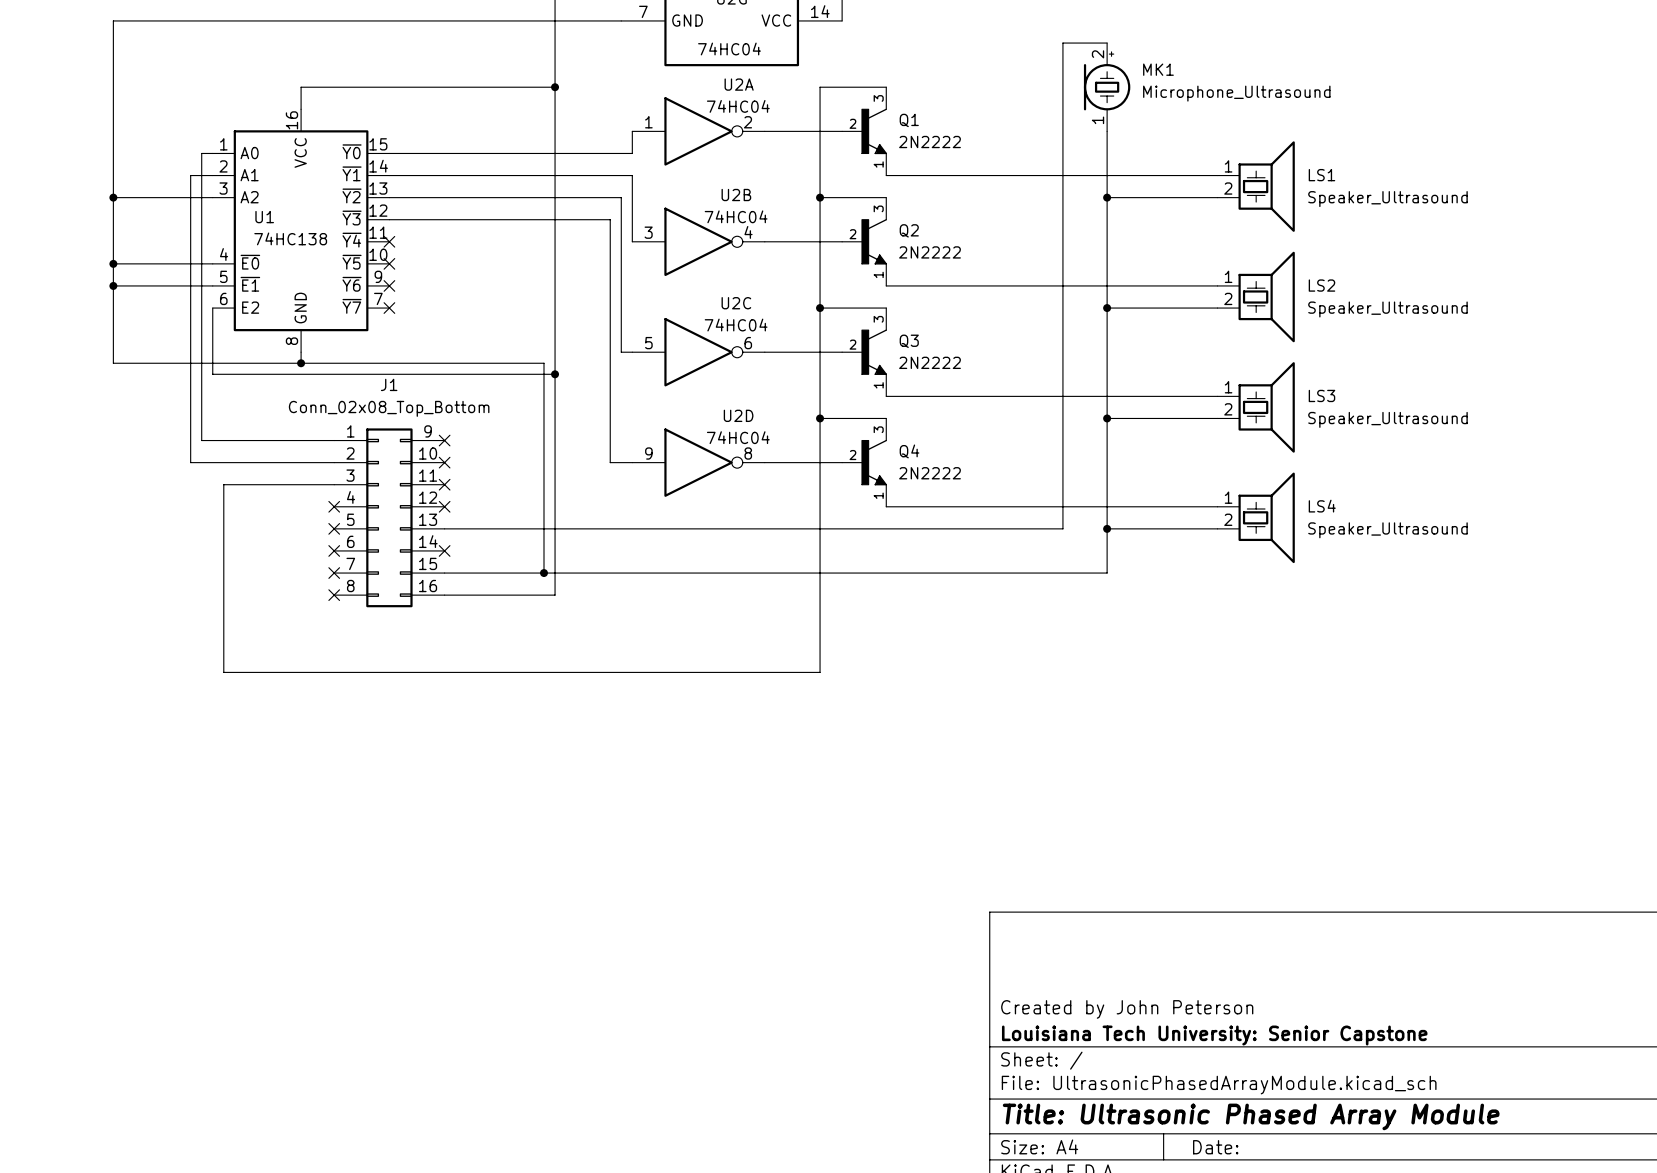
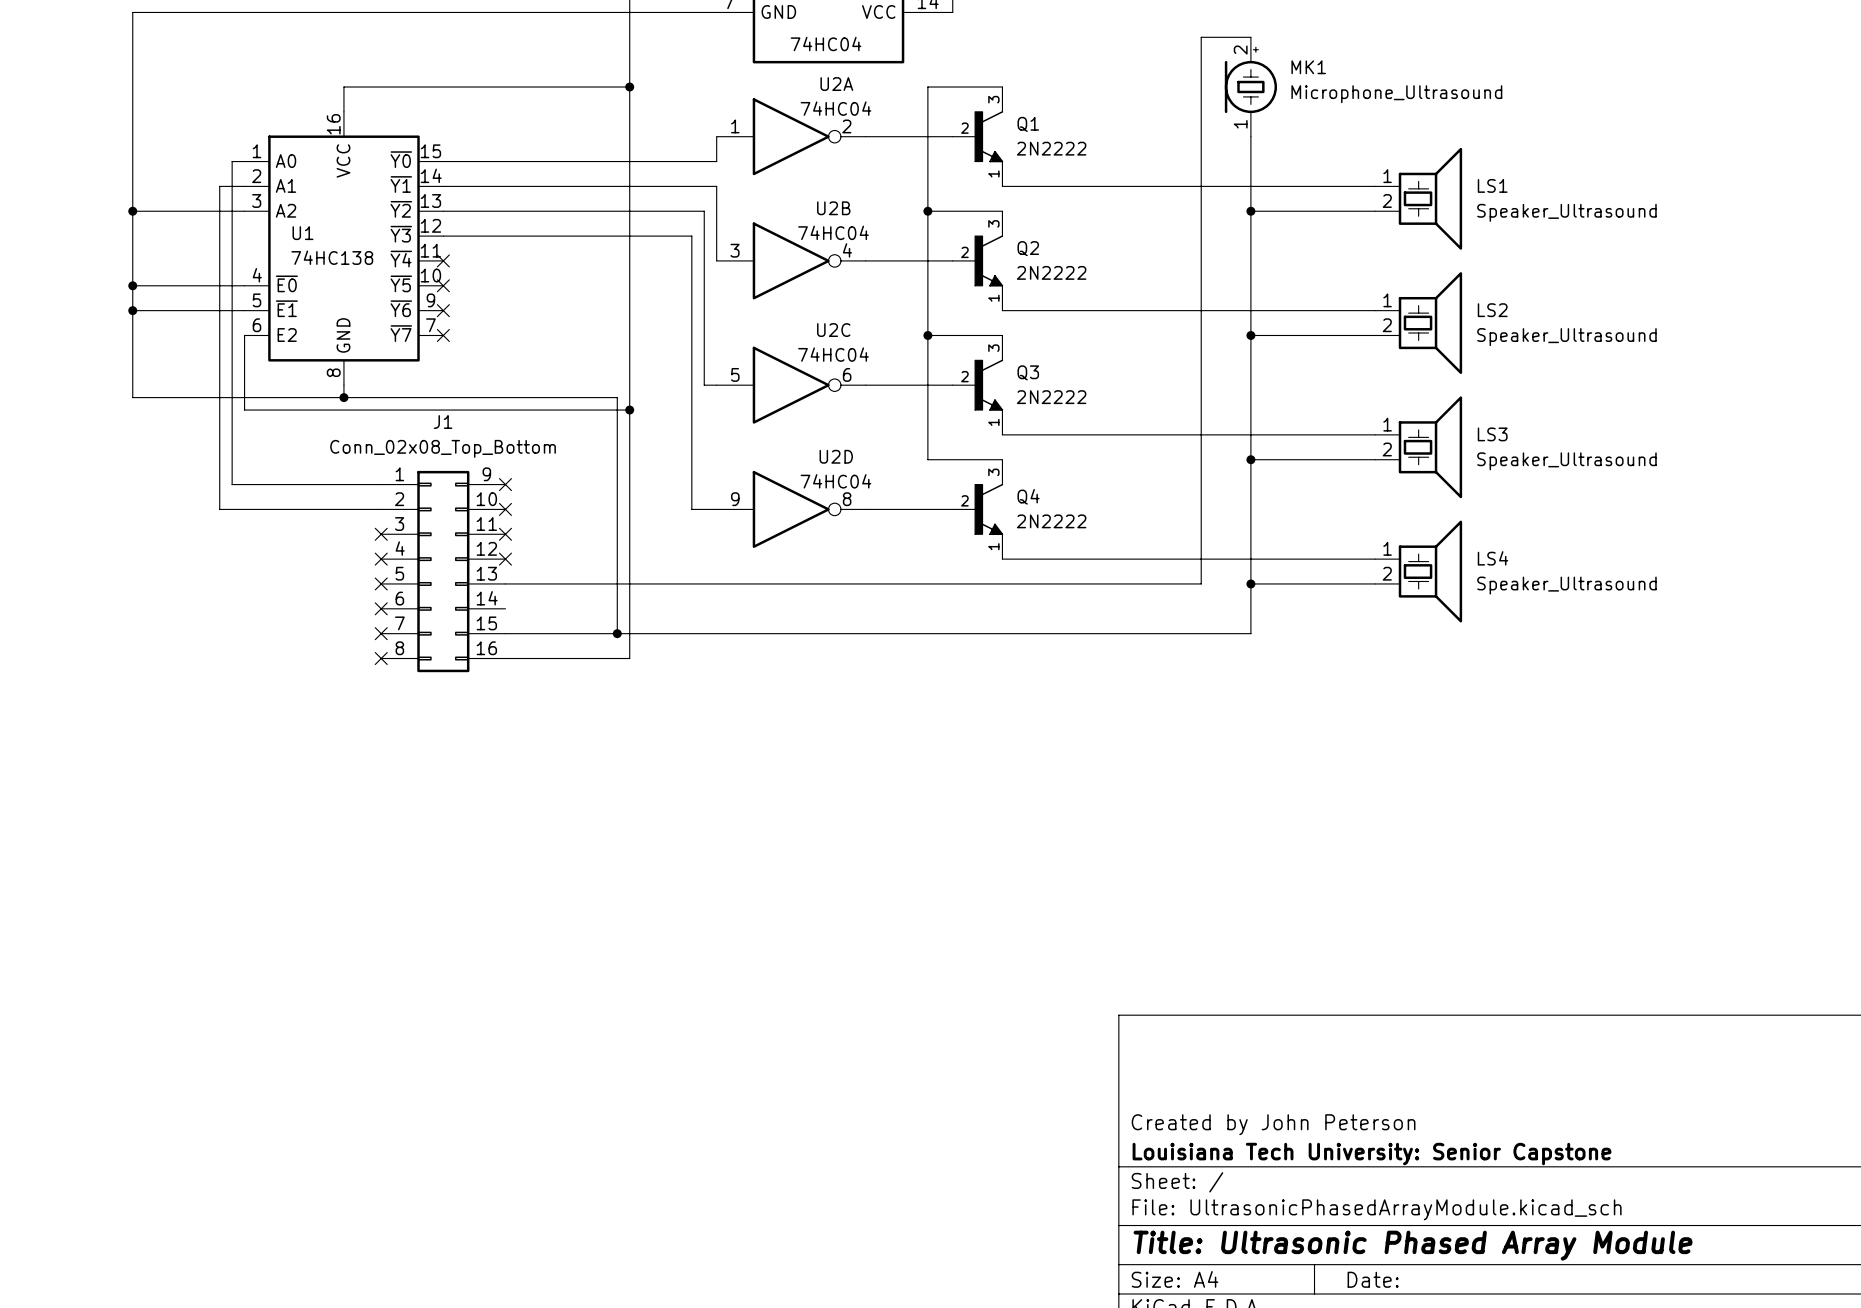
wire: (820, 418) (820, 672) (223, 672) (223, 484) (334, 484) -> none
junction: (820, 418) -> none
no-connect mark: none -> (381, 534)
no-connect mark: (444, 550) -> none

